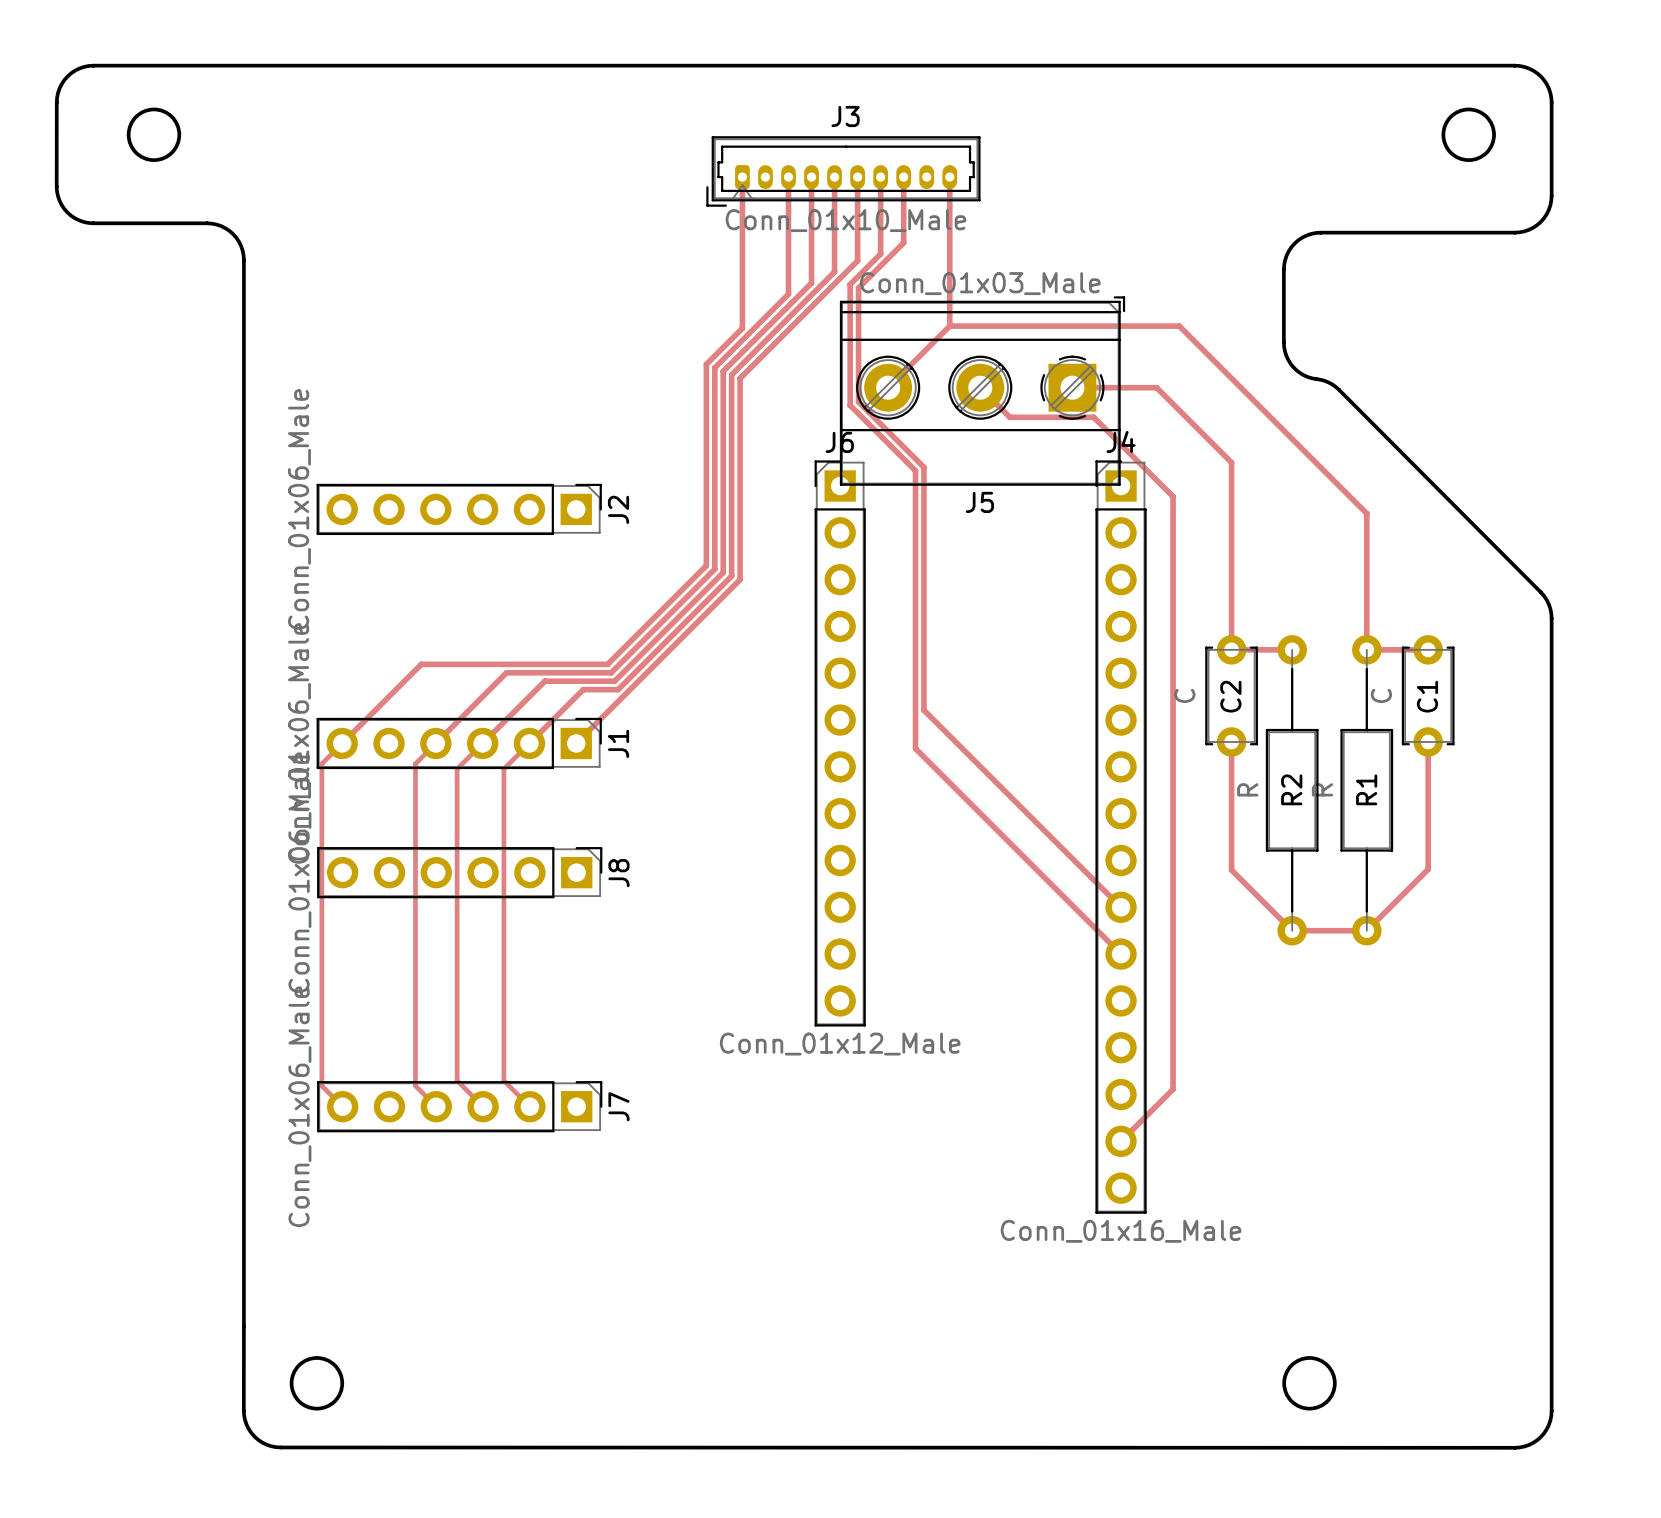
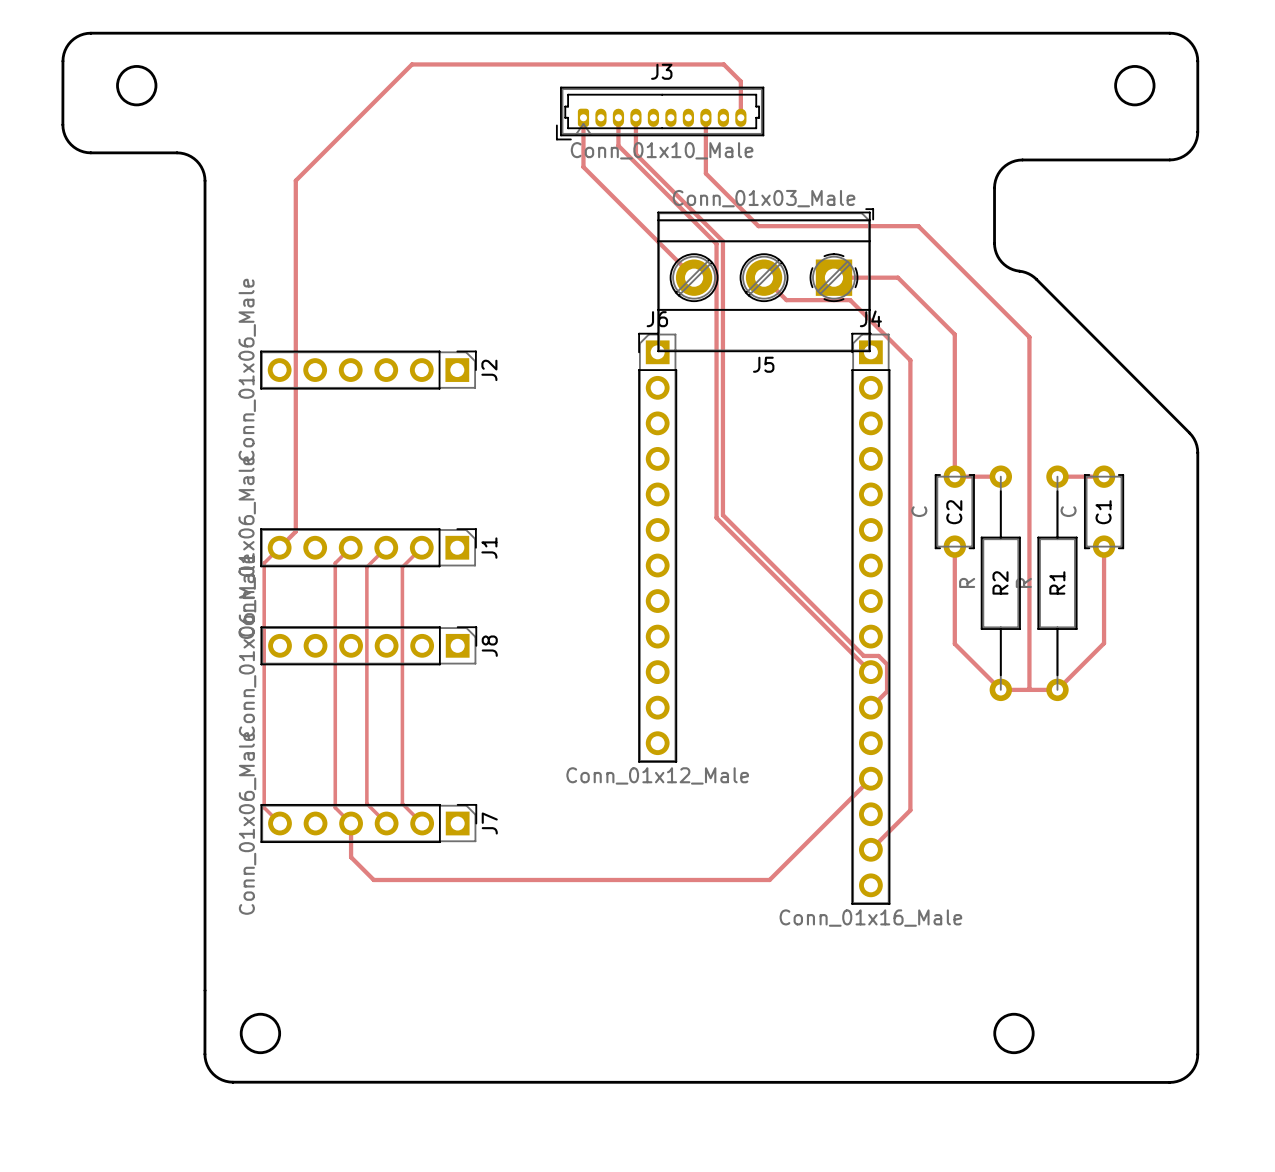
track: (834, 177) (834, 271) (731, 374) (731, 576) (618, 689) (583, 689) (529, 743) -> none
track: (857, 177) (857, 260) (740, 378) (740, 579) (576, 743) -> none
track: (880, 177) (880, 253) (850, 284) (850, 405) (915, 470) (915, 748) (1121, 954) -> (635, 154) (722, 241) (722, 515) (863, 655) (878, 655) (887, 664) (887, 691) (870, 707)
track: (949, 177) (949, 326) -> none
track: (788, 214) (788, 294) (714, 367) (714, 569) (611, 672) (506, 672) (435, 743) -> none
track: (811, 225) (811, 283) (723, 371) (723, 572) (614, 681) (544, 681) (482, 743) -> none
track: (742, 242) (742, 328) (706, 364) (706, 565) (607, 664) (421, 664) (363, 722) -> (740, 117) (740, 81) (723, 64) (412, 64) (295, 180) (295, 531)
track: (903, 242) (858, 287) (858, 401) (923, 467) (923, 710) -> (618, 145) (716, 243) (716, 517) (721, 522)
track: none -> (705, 167) (705, 173) (758, 226) (918, 226) (1029, 337) (1030, 689)
track: (949, 326) (888, 387) -> (583, 167) (694, 277)
track: (949, 326) (1179, 326) (1366, 513) (1366, 649) -> none
track: none -> (870, 778) (769, 880) (373, 880) (351, 857) (351, 823)

